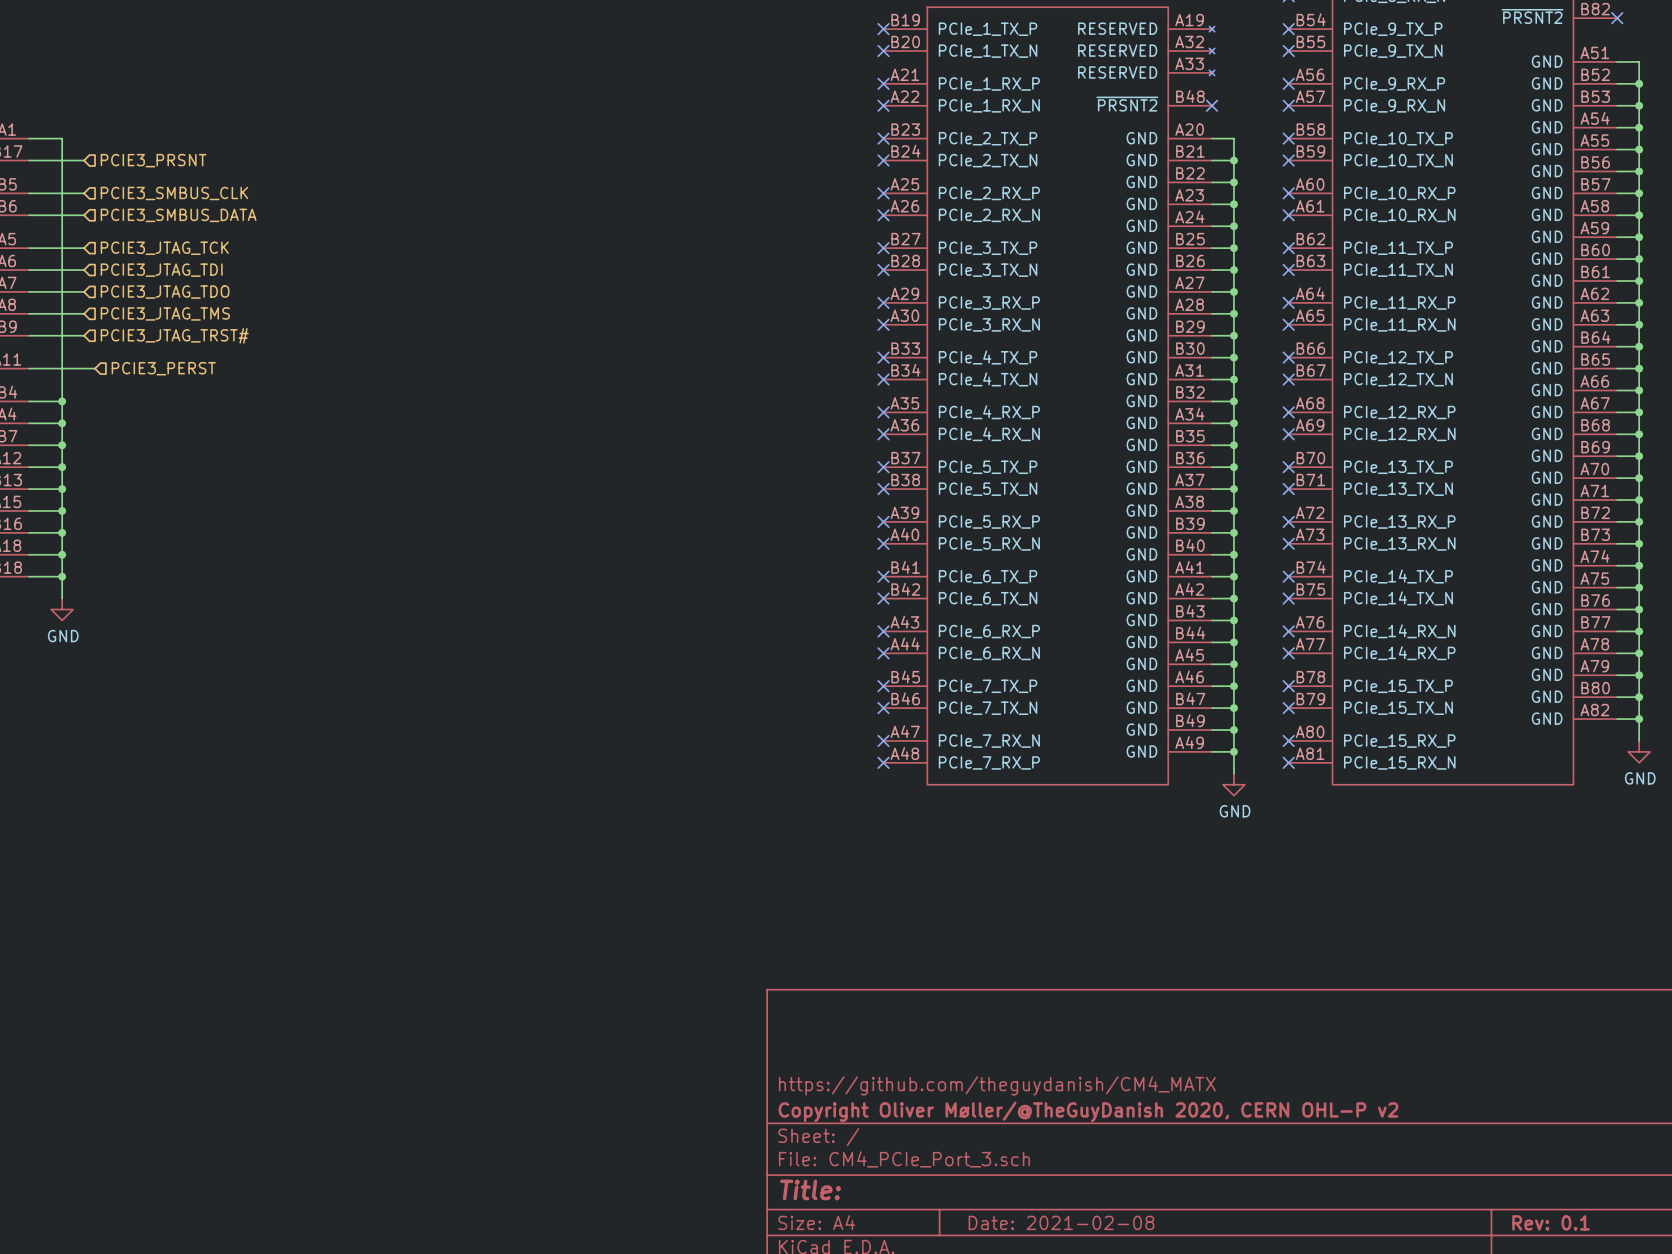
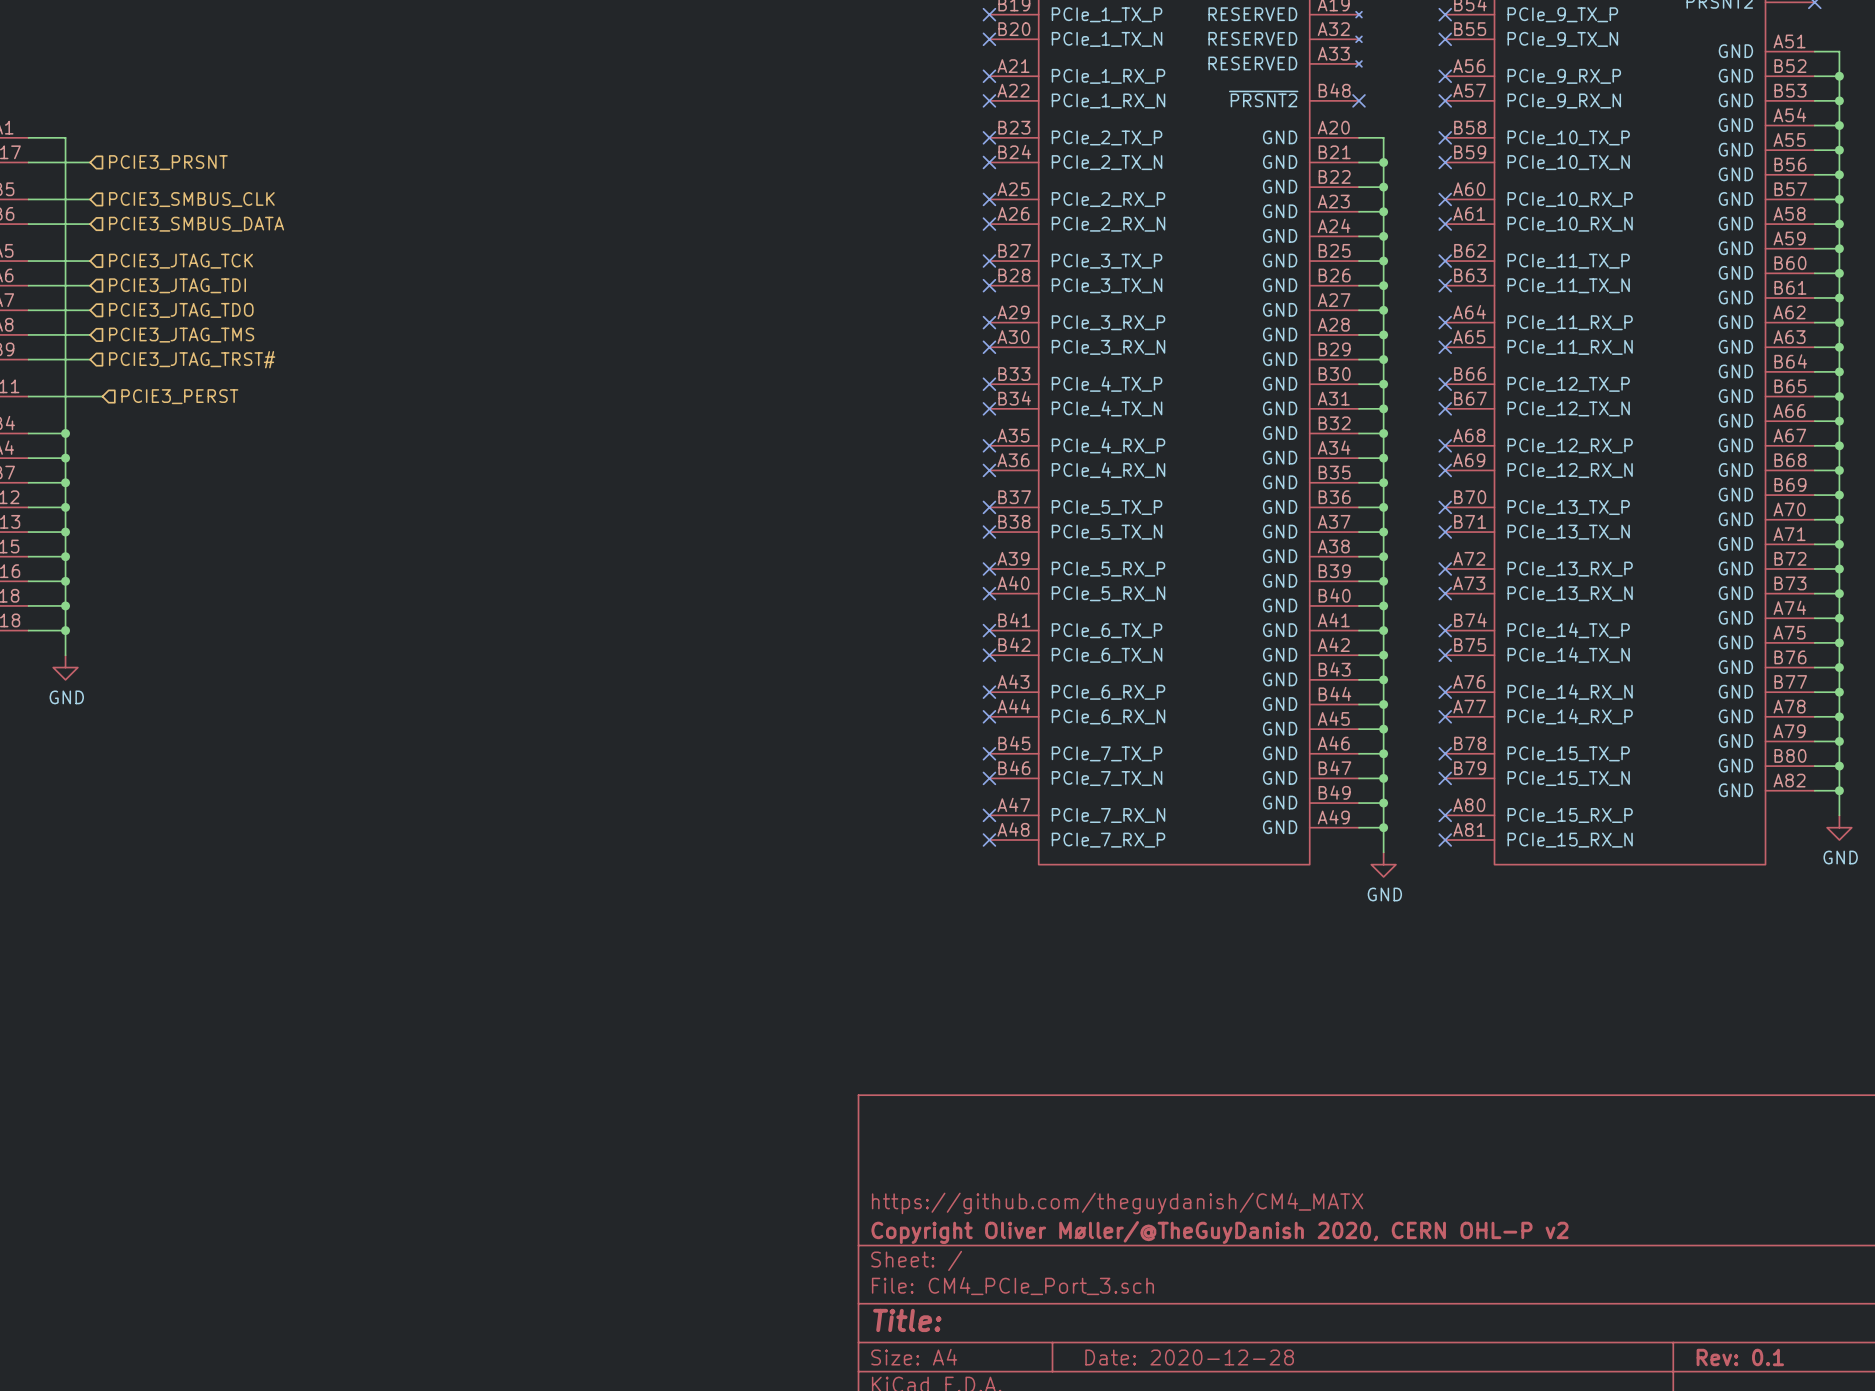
title block: Date: 2021-02-08 (1061, 1222) -> Date: 2020-12-28 (1189, 1357)

